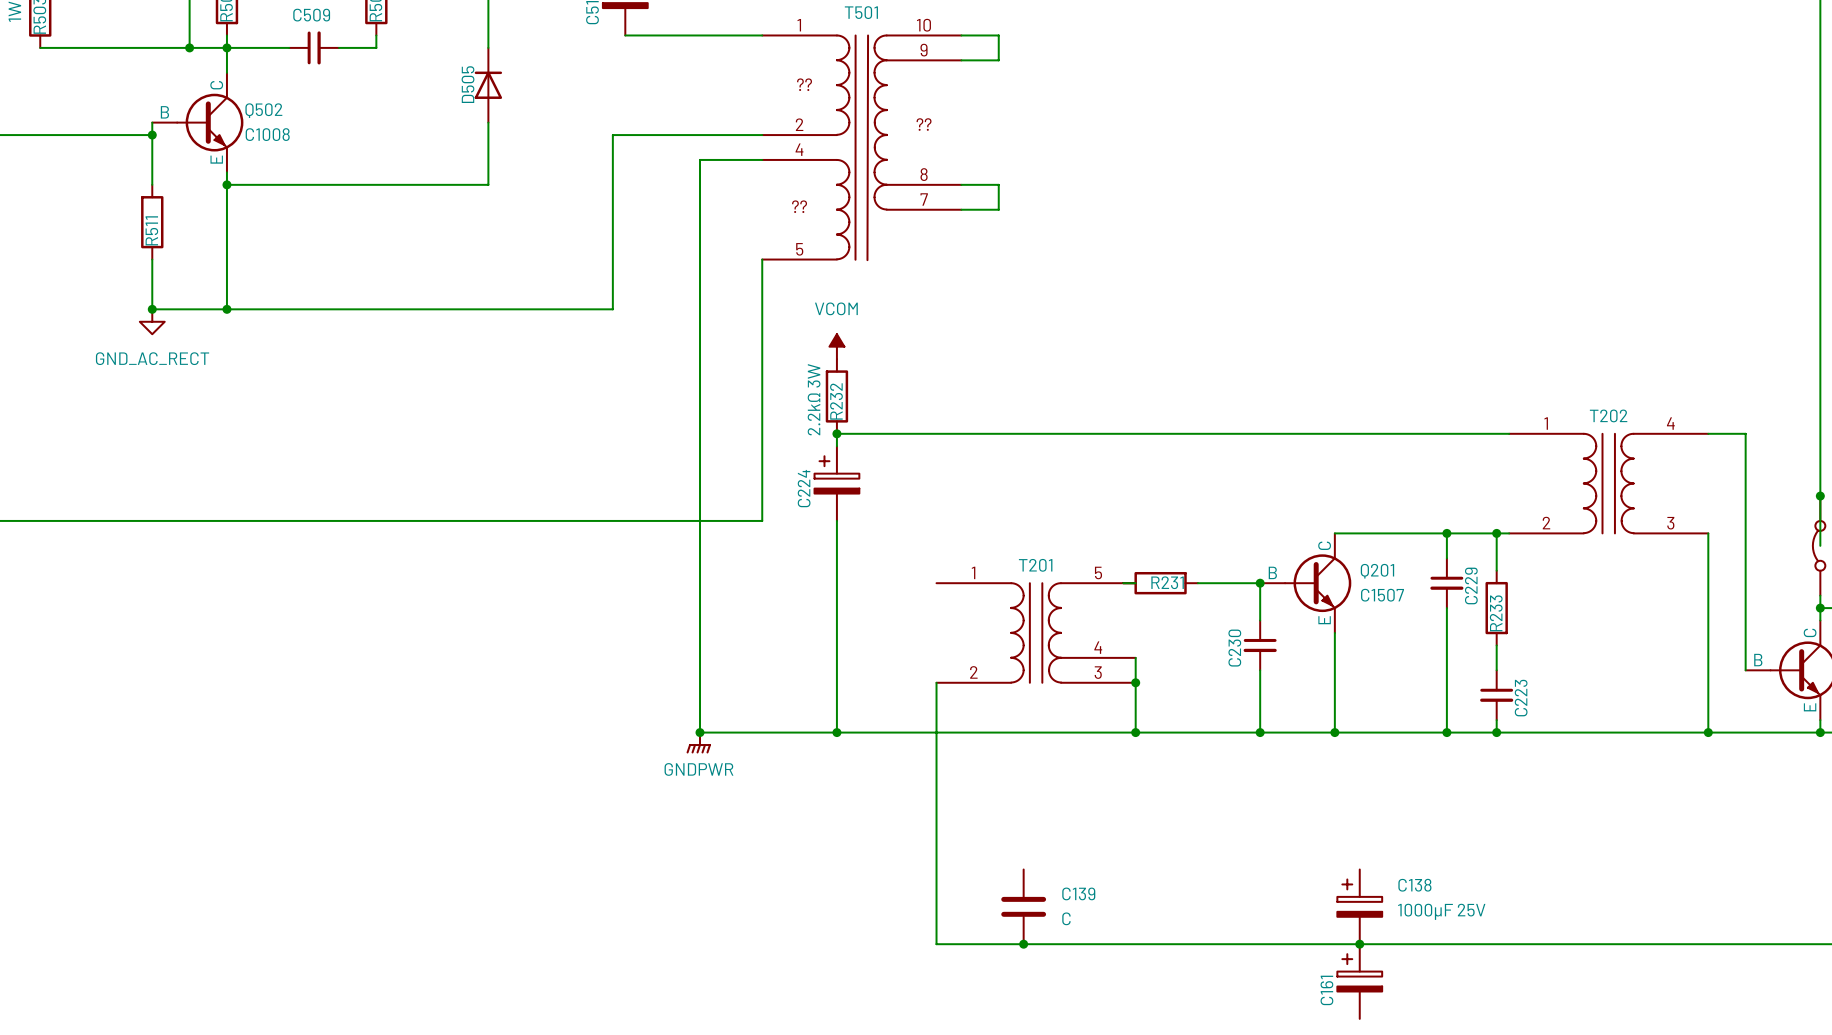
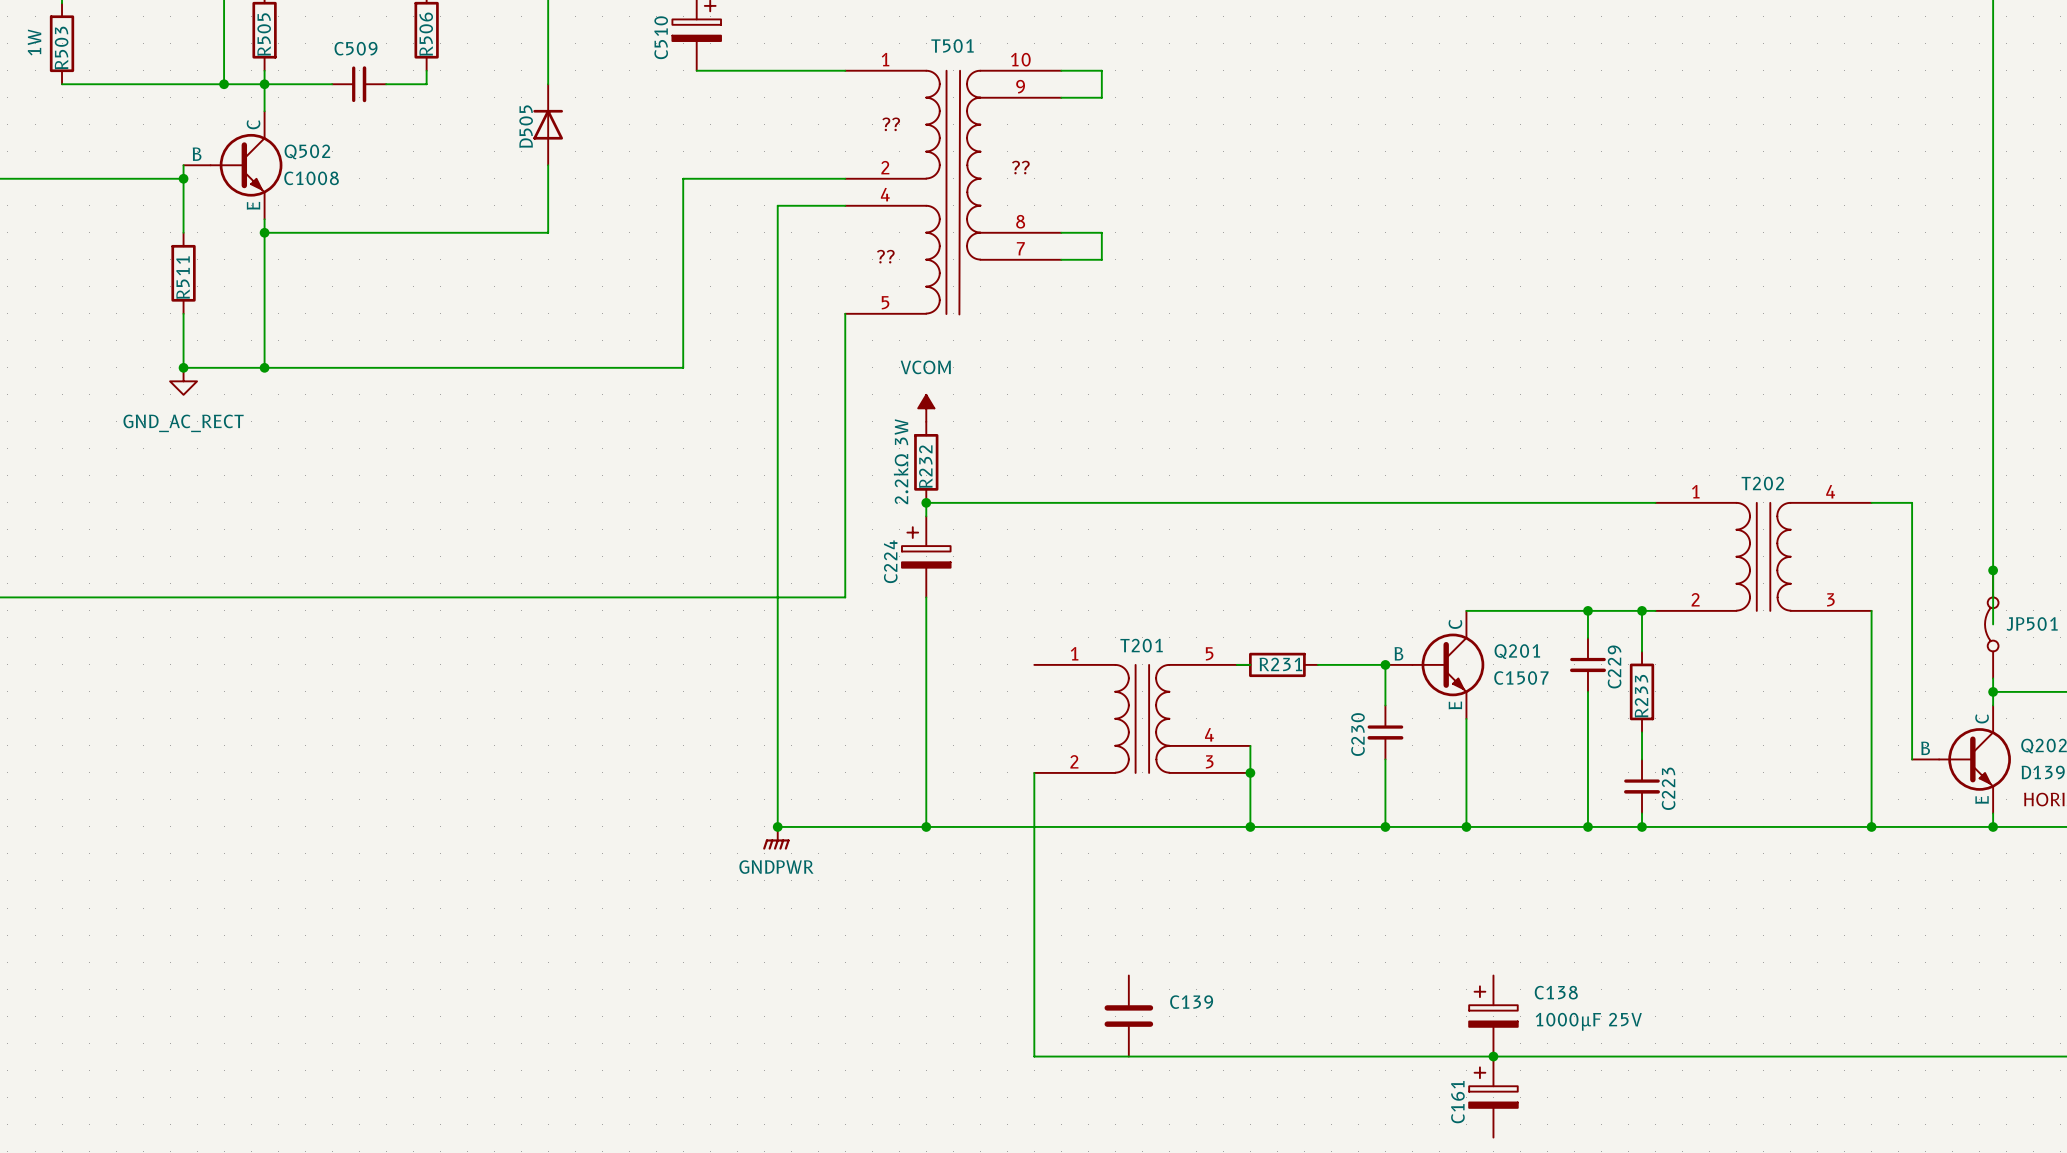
C139 value: C (1066, 918) -> none
junction: (1023, 944) -> none

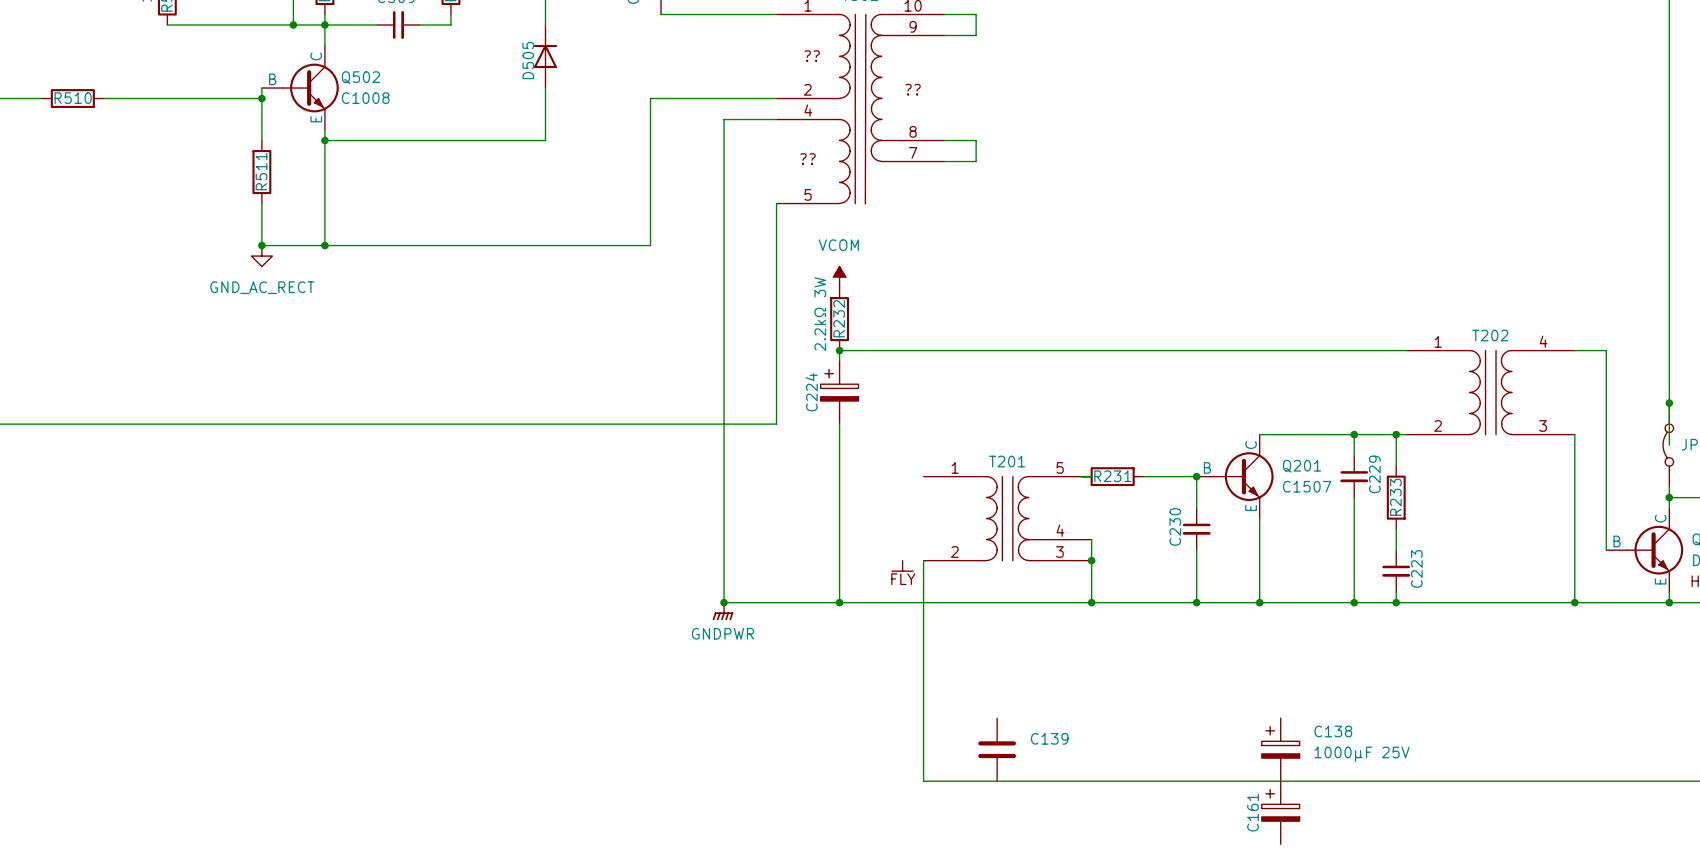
power symbol: none -> (902, 565)
junction: (1493, 1056) -> none

